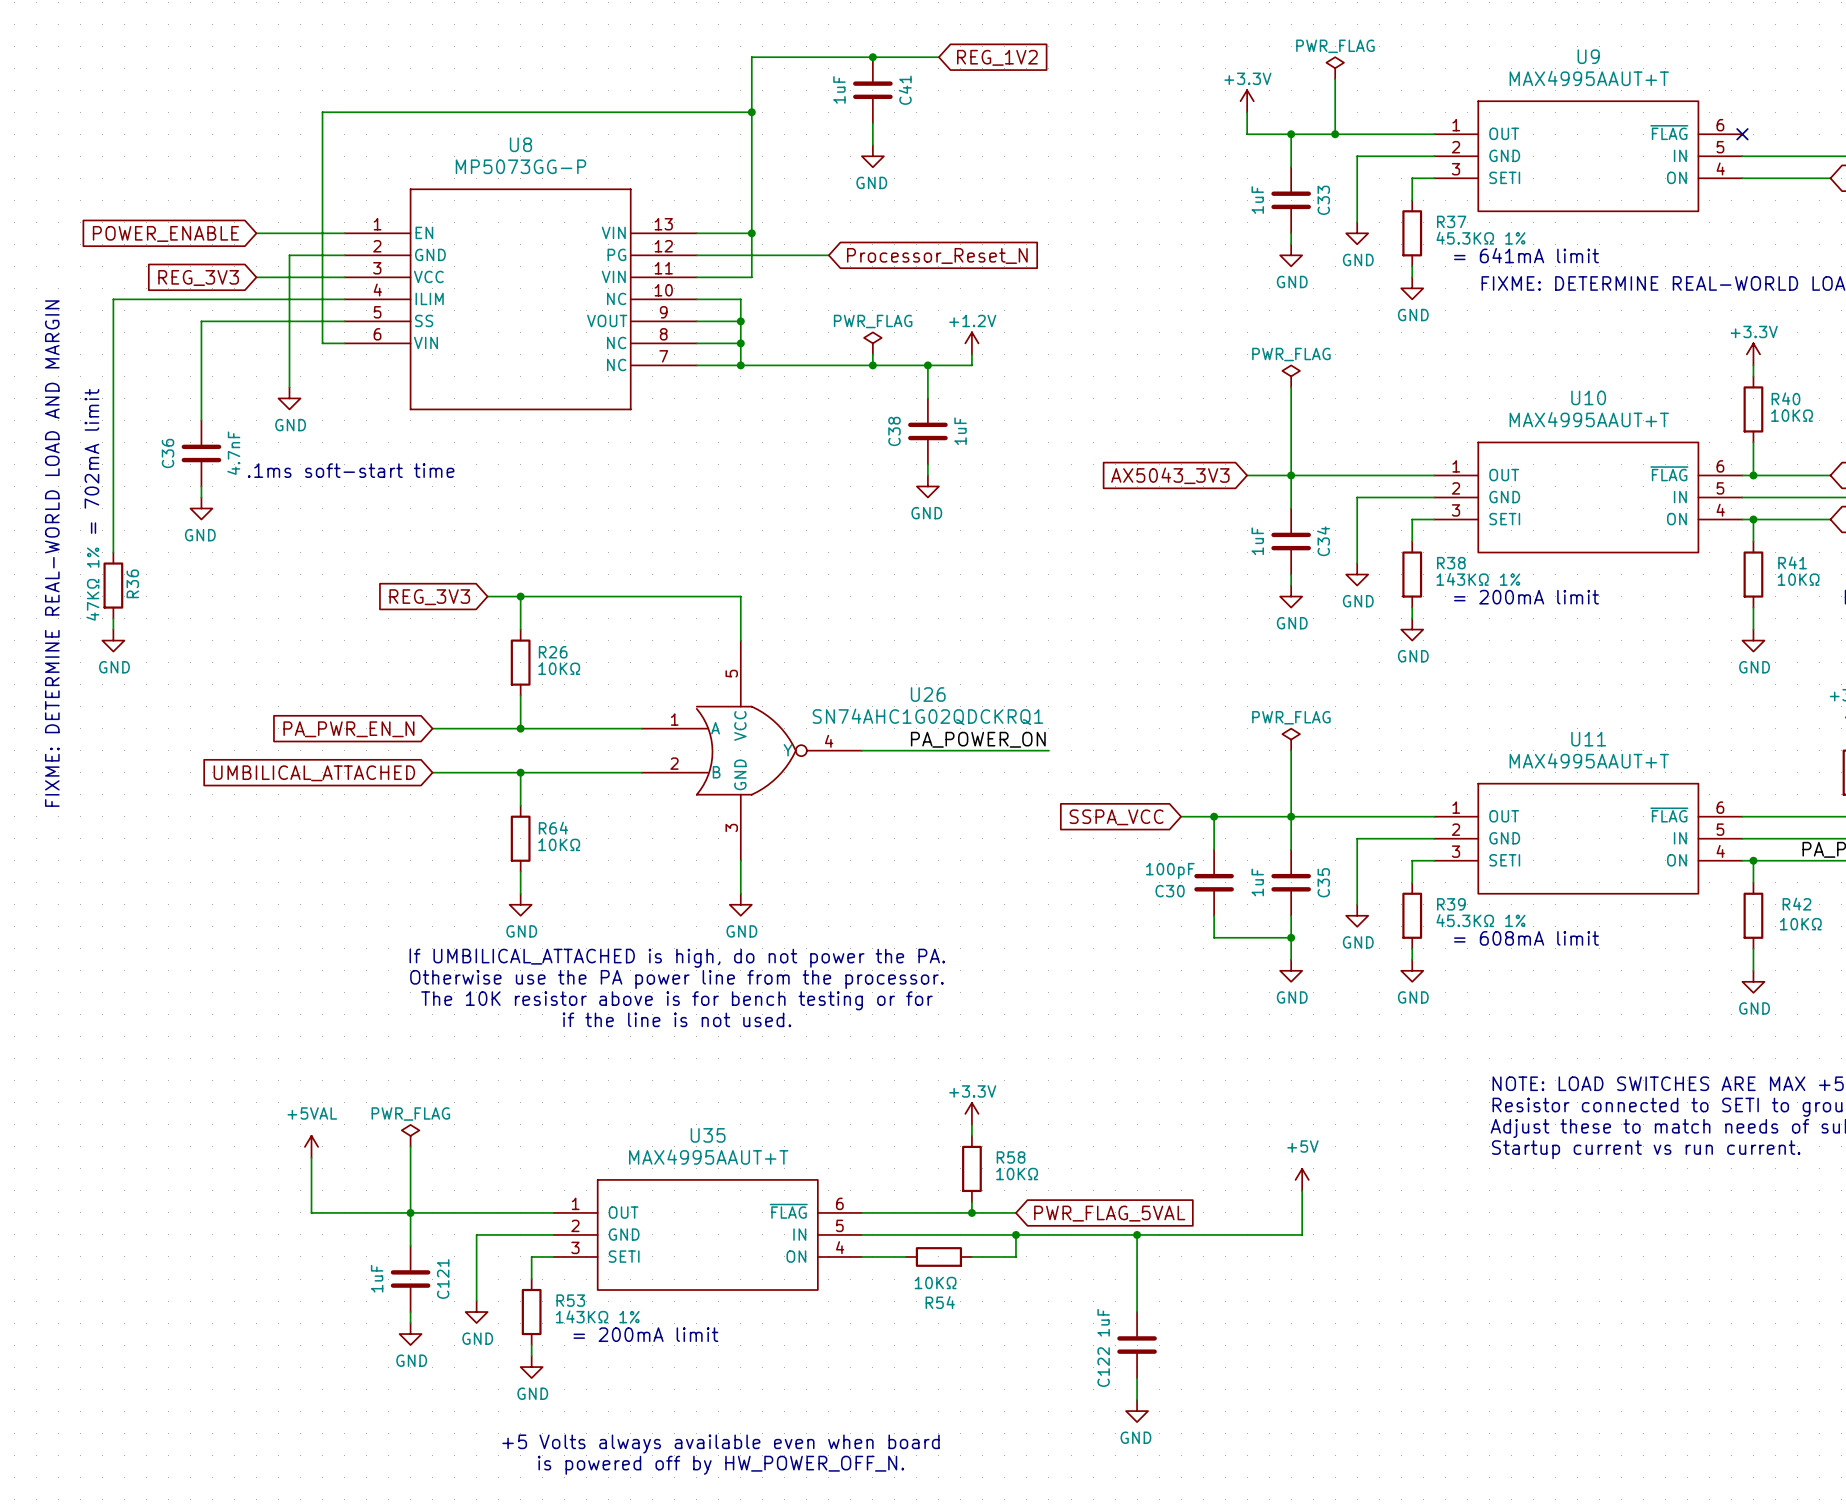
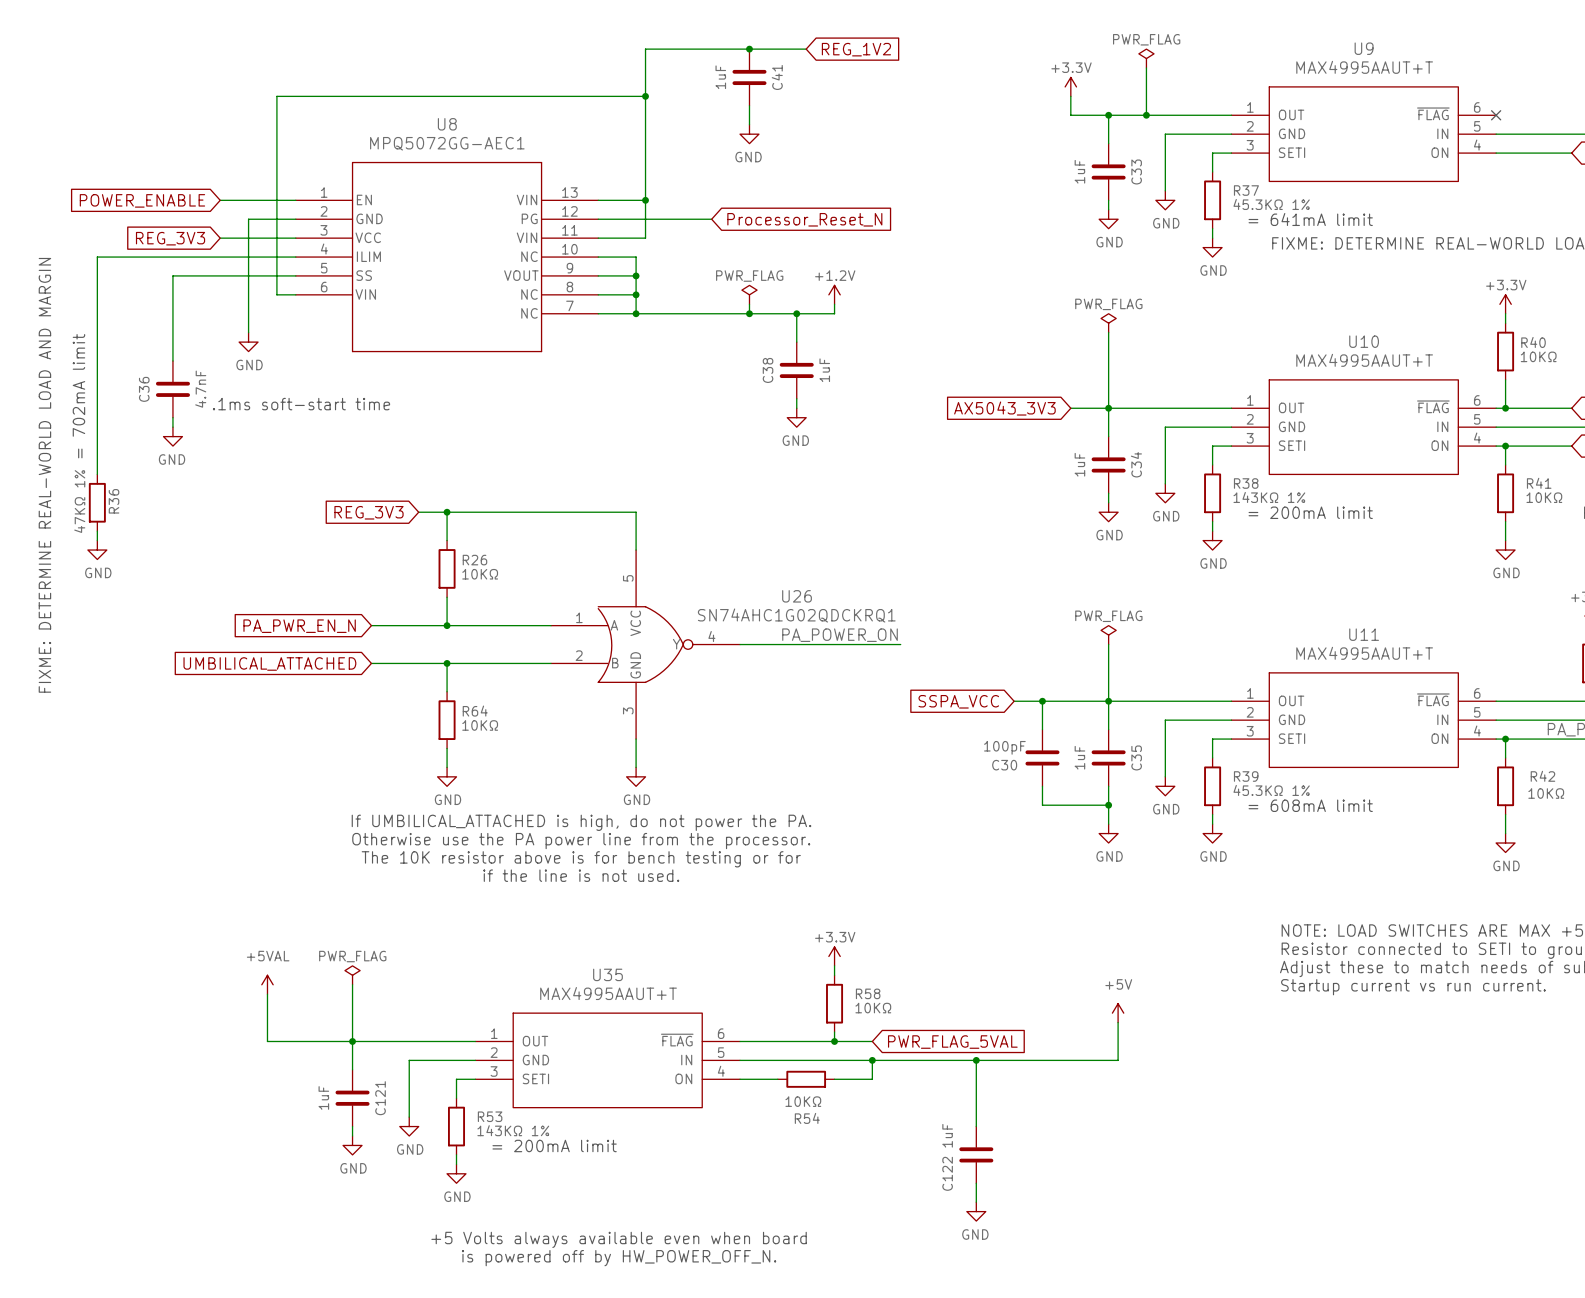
U8 value: MP5073GG-P (520, 166) -> MPQ5072GG-AEC1 (447, 143)

